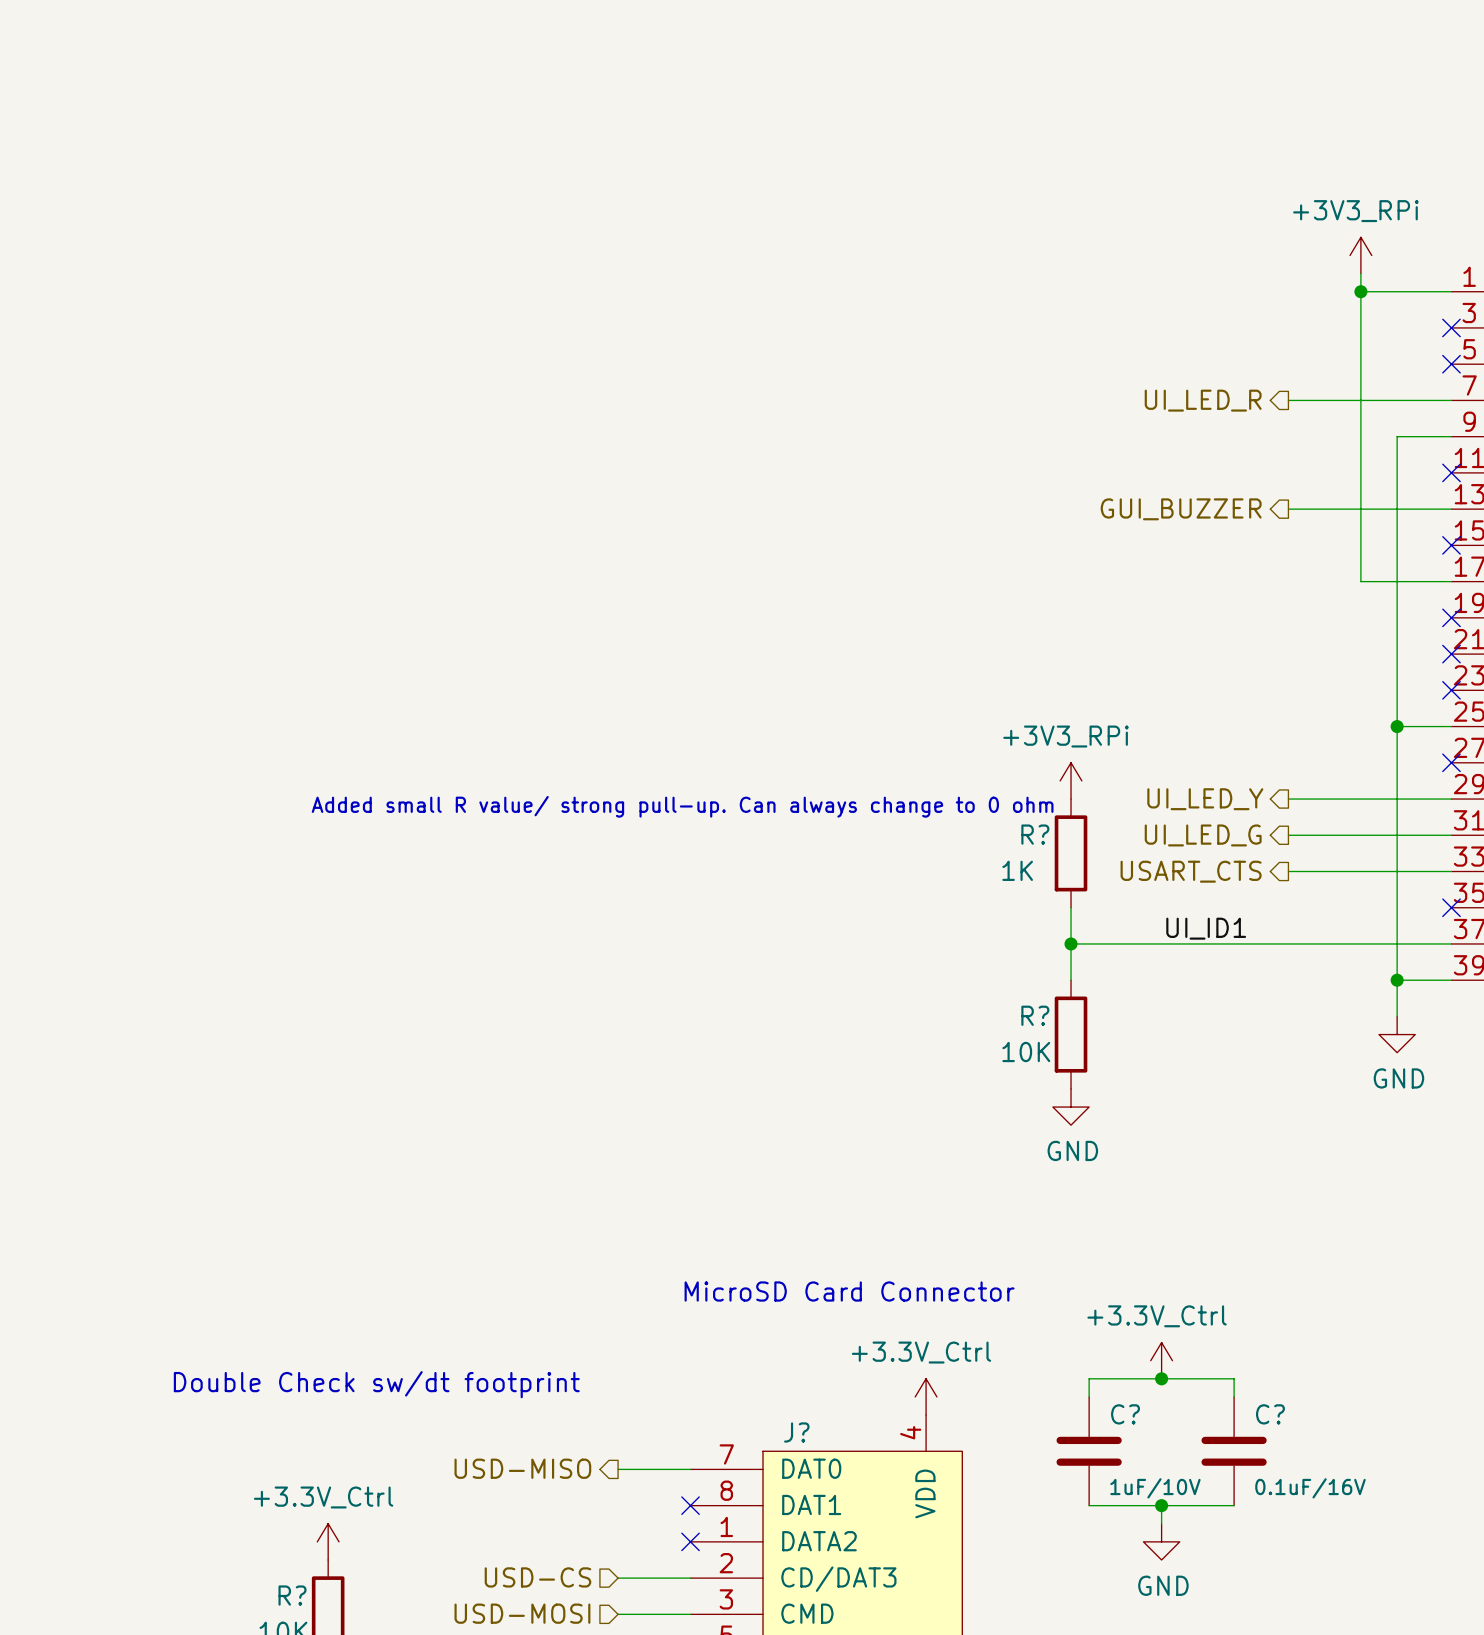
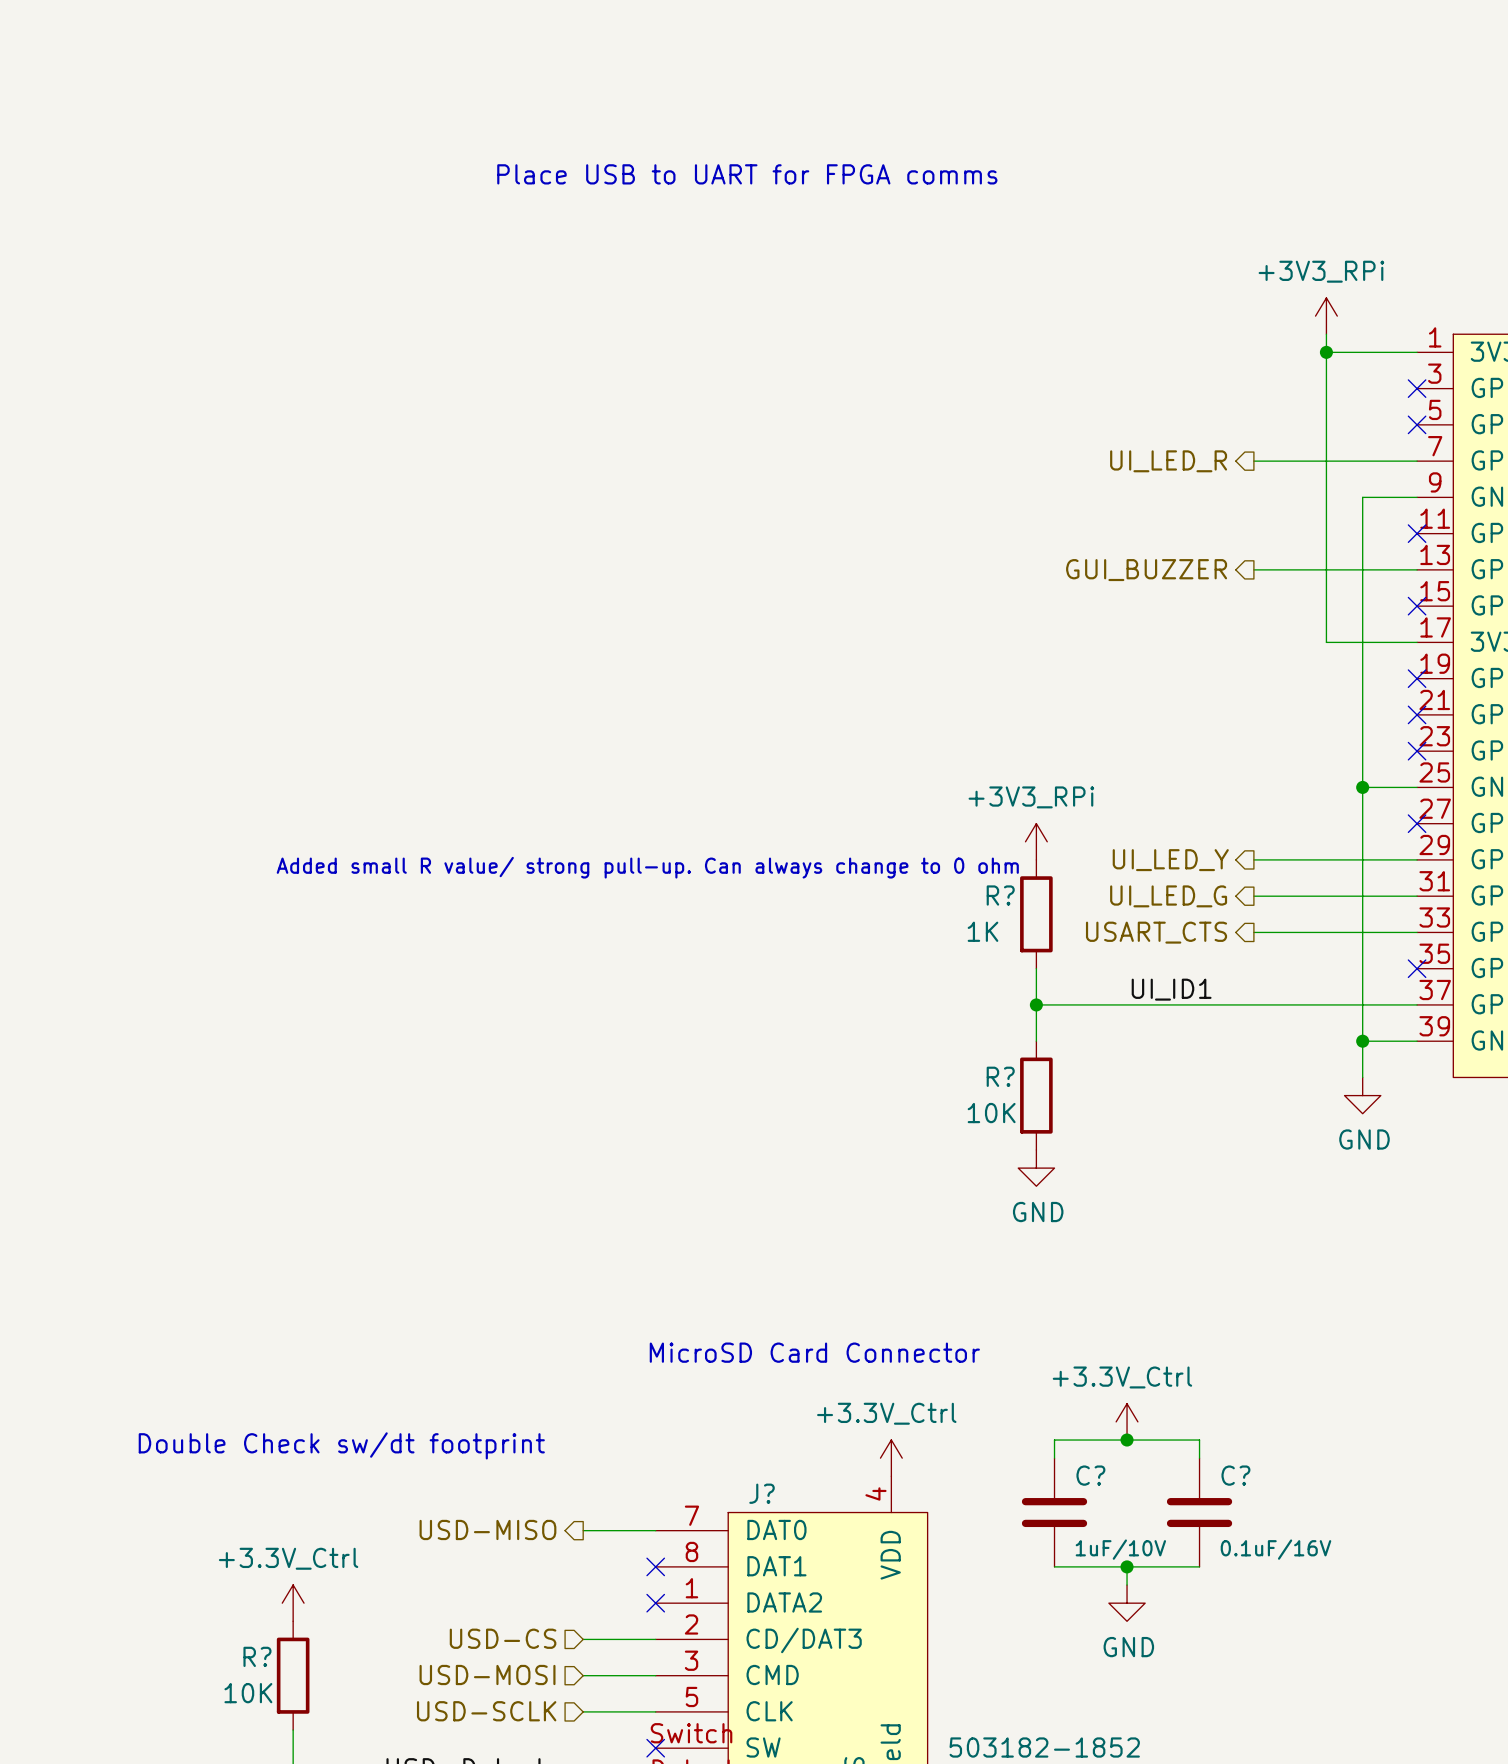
text: none -> Place USB to UART for FPGA comms (747, 174)

